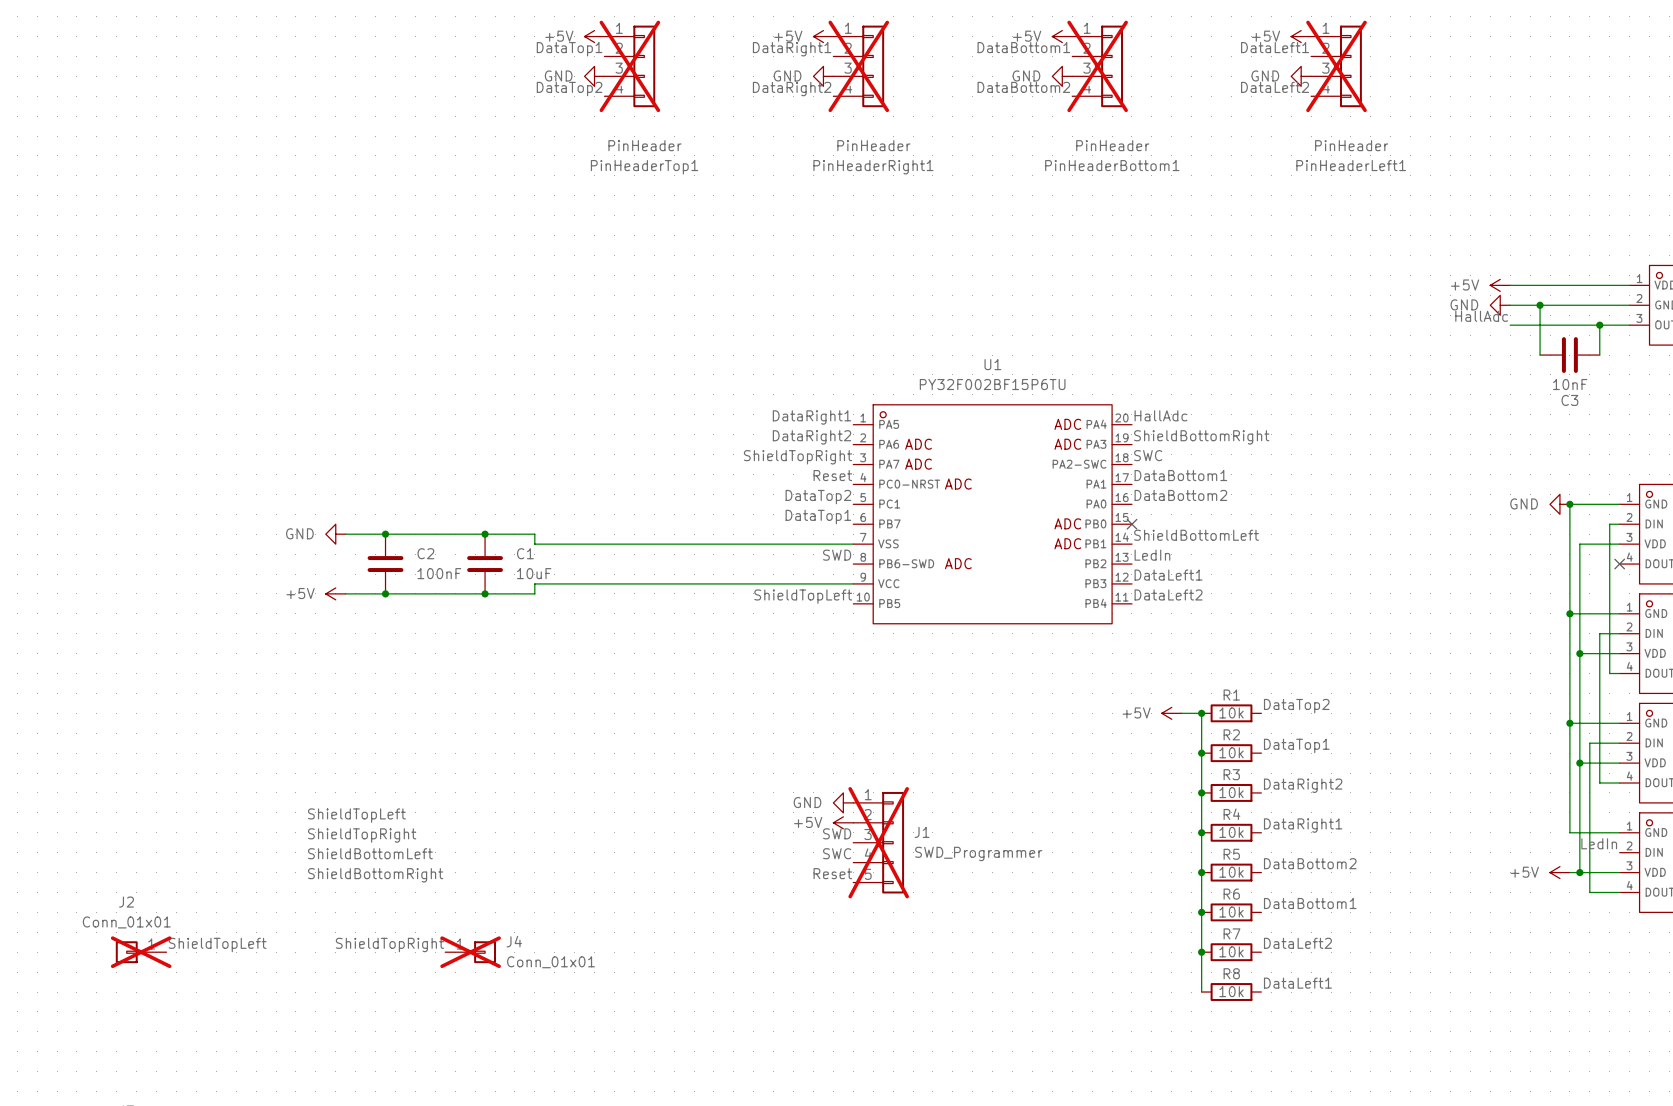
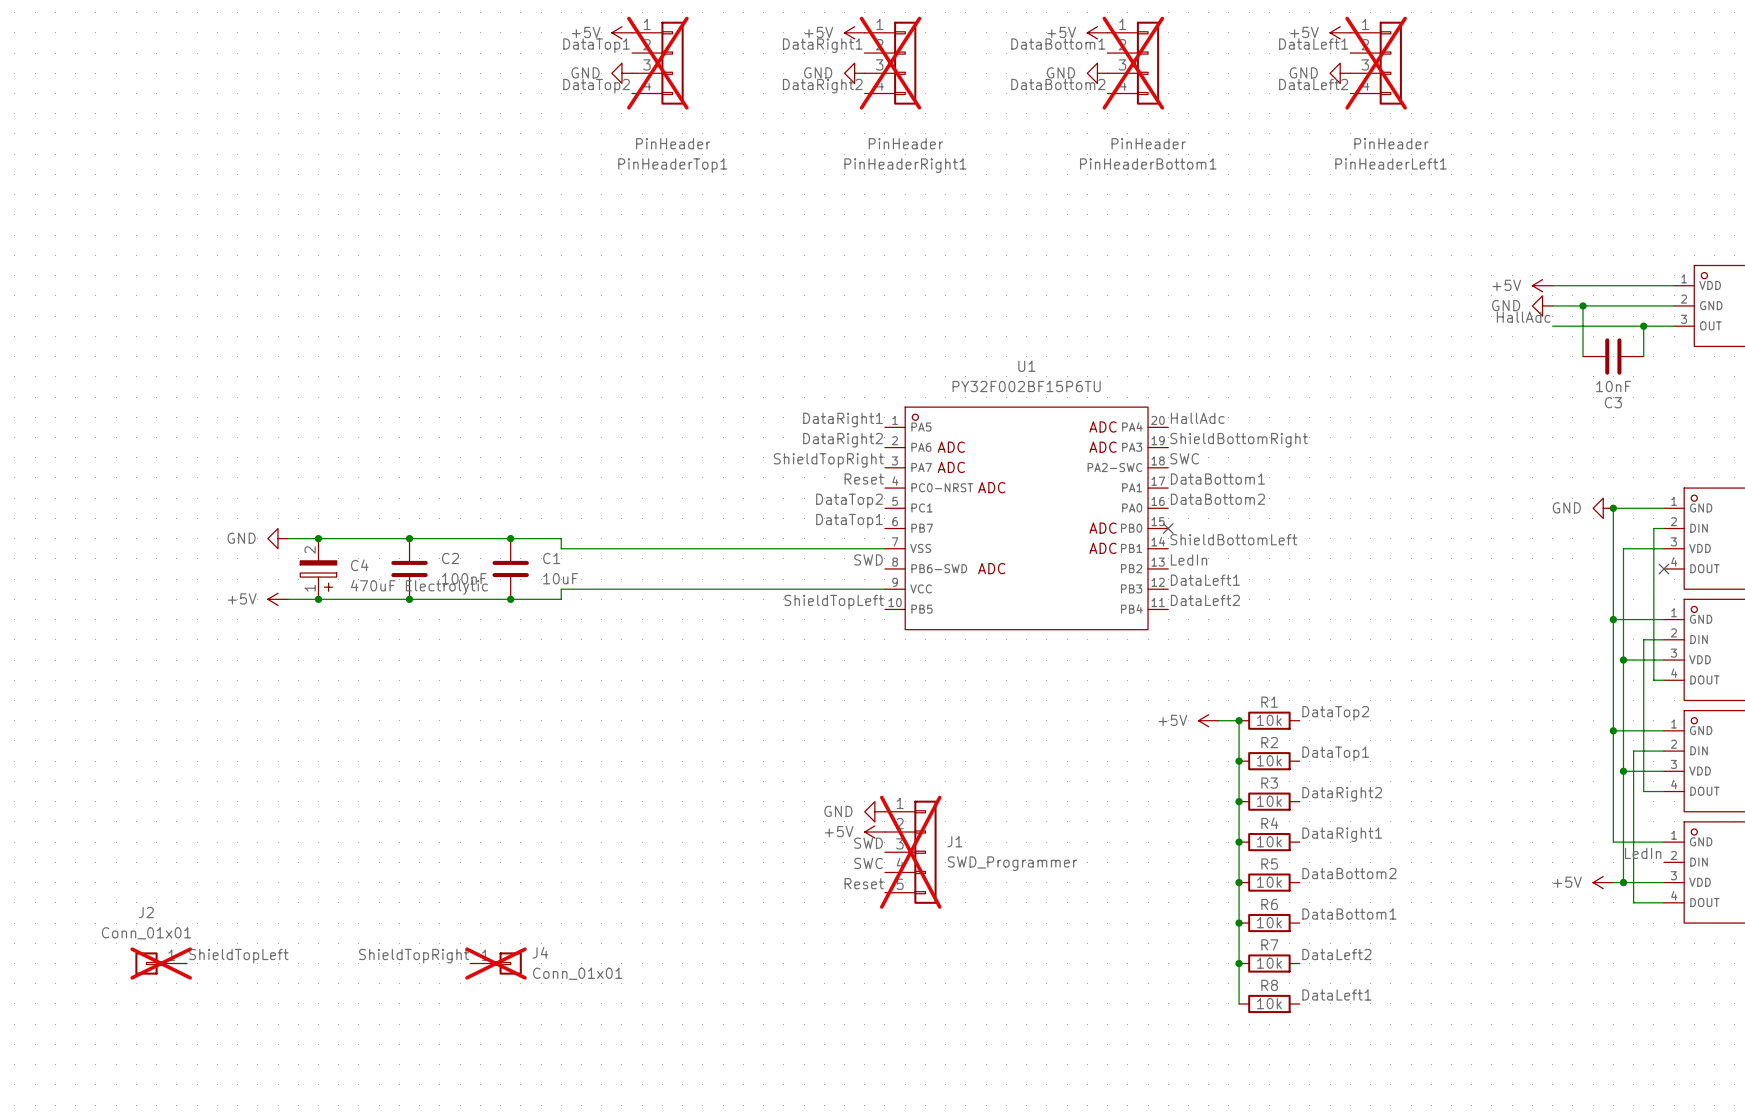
wire: none -> (288, 538) (369, 538)
junction: none -> (318, 538)
power symbol position: GND (335, 534) -> GND (278, 538)
C4: none -> 470uF Electrolytic (318, 568)
wire: none -> (288, 599) (369, 599)
junction: none -> (318, 599)
power symbol position: +5V (335, 593) -> +5V (278, 599)
label: ShieldTopLeft (356, 815) -> none
label: ShieldTopRight (362, 835) -> none
label: ShieldBottomLeft (370, 853) -> none
label: ShieldBottomRight (375, 875) -> none

